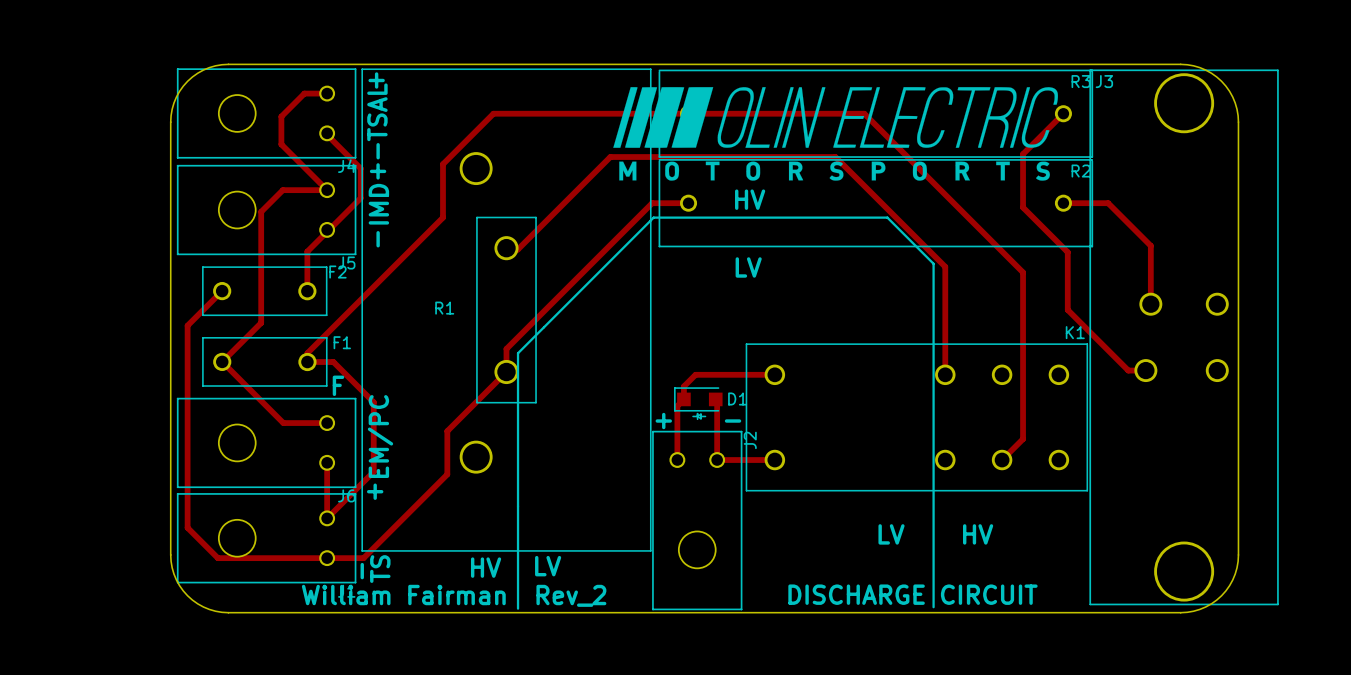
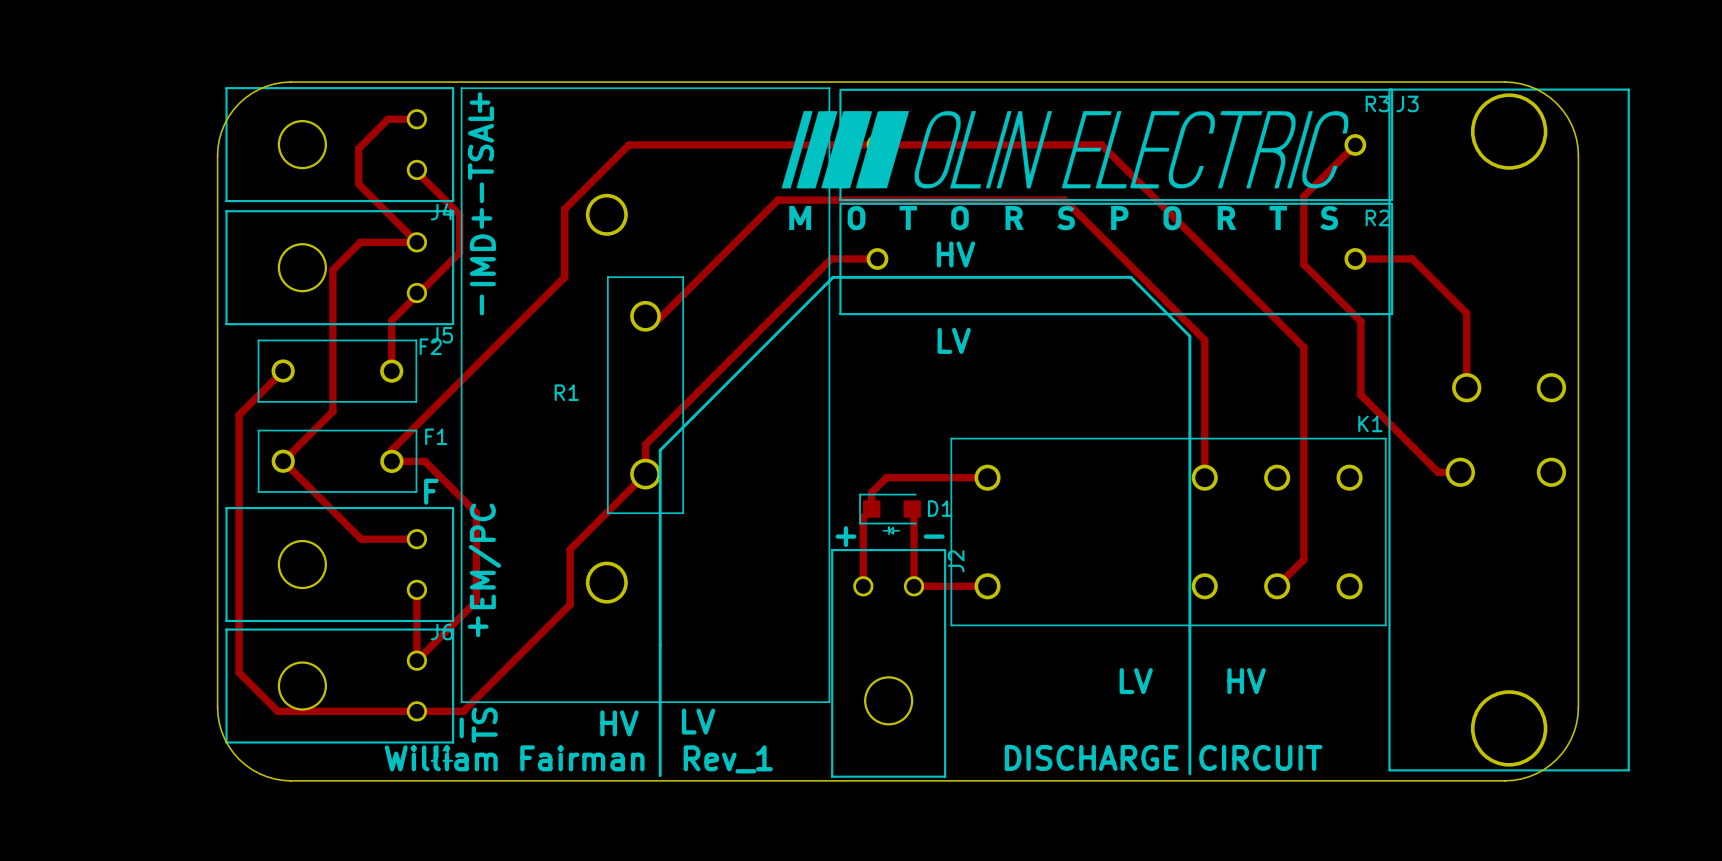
text: William Fairman Rev_2 (454, 595) -> William Fairman Rev_1 (578, 759)

